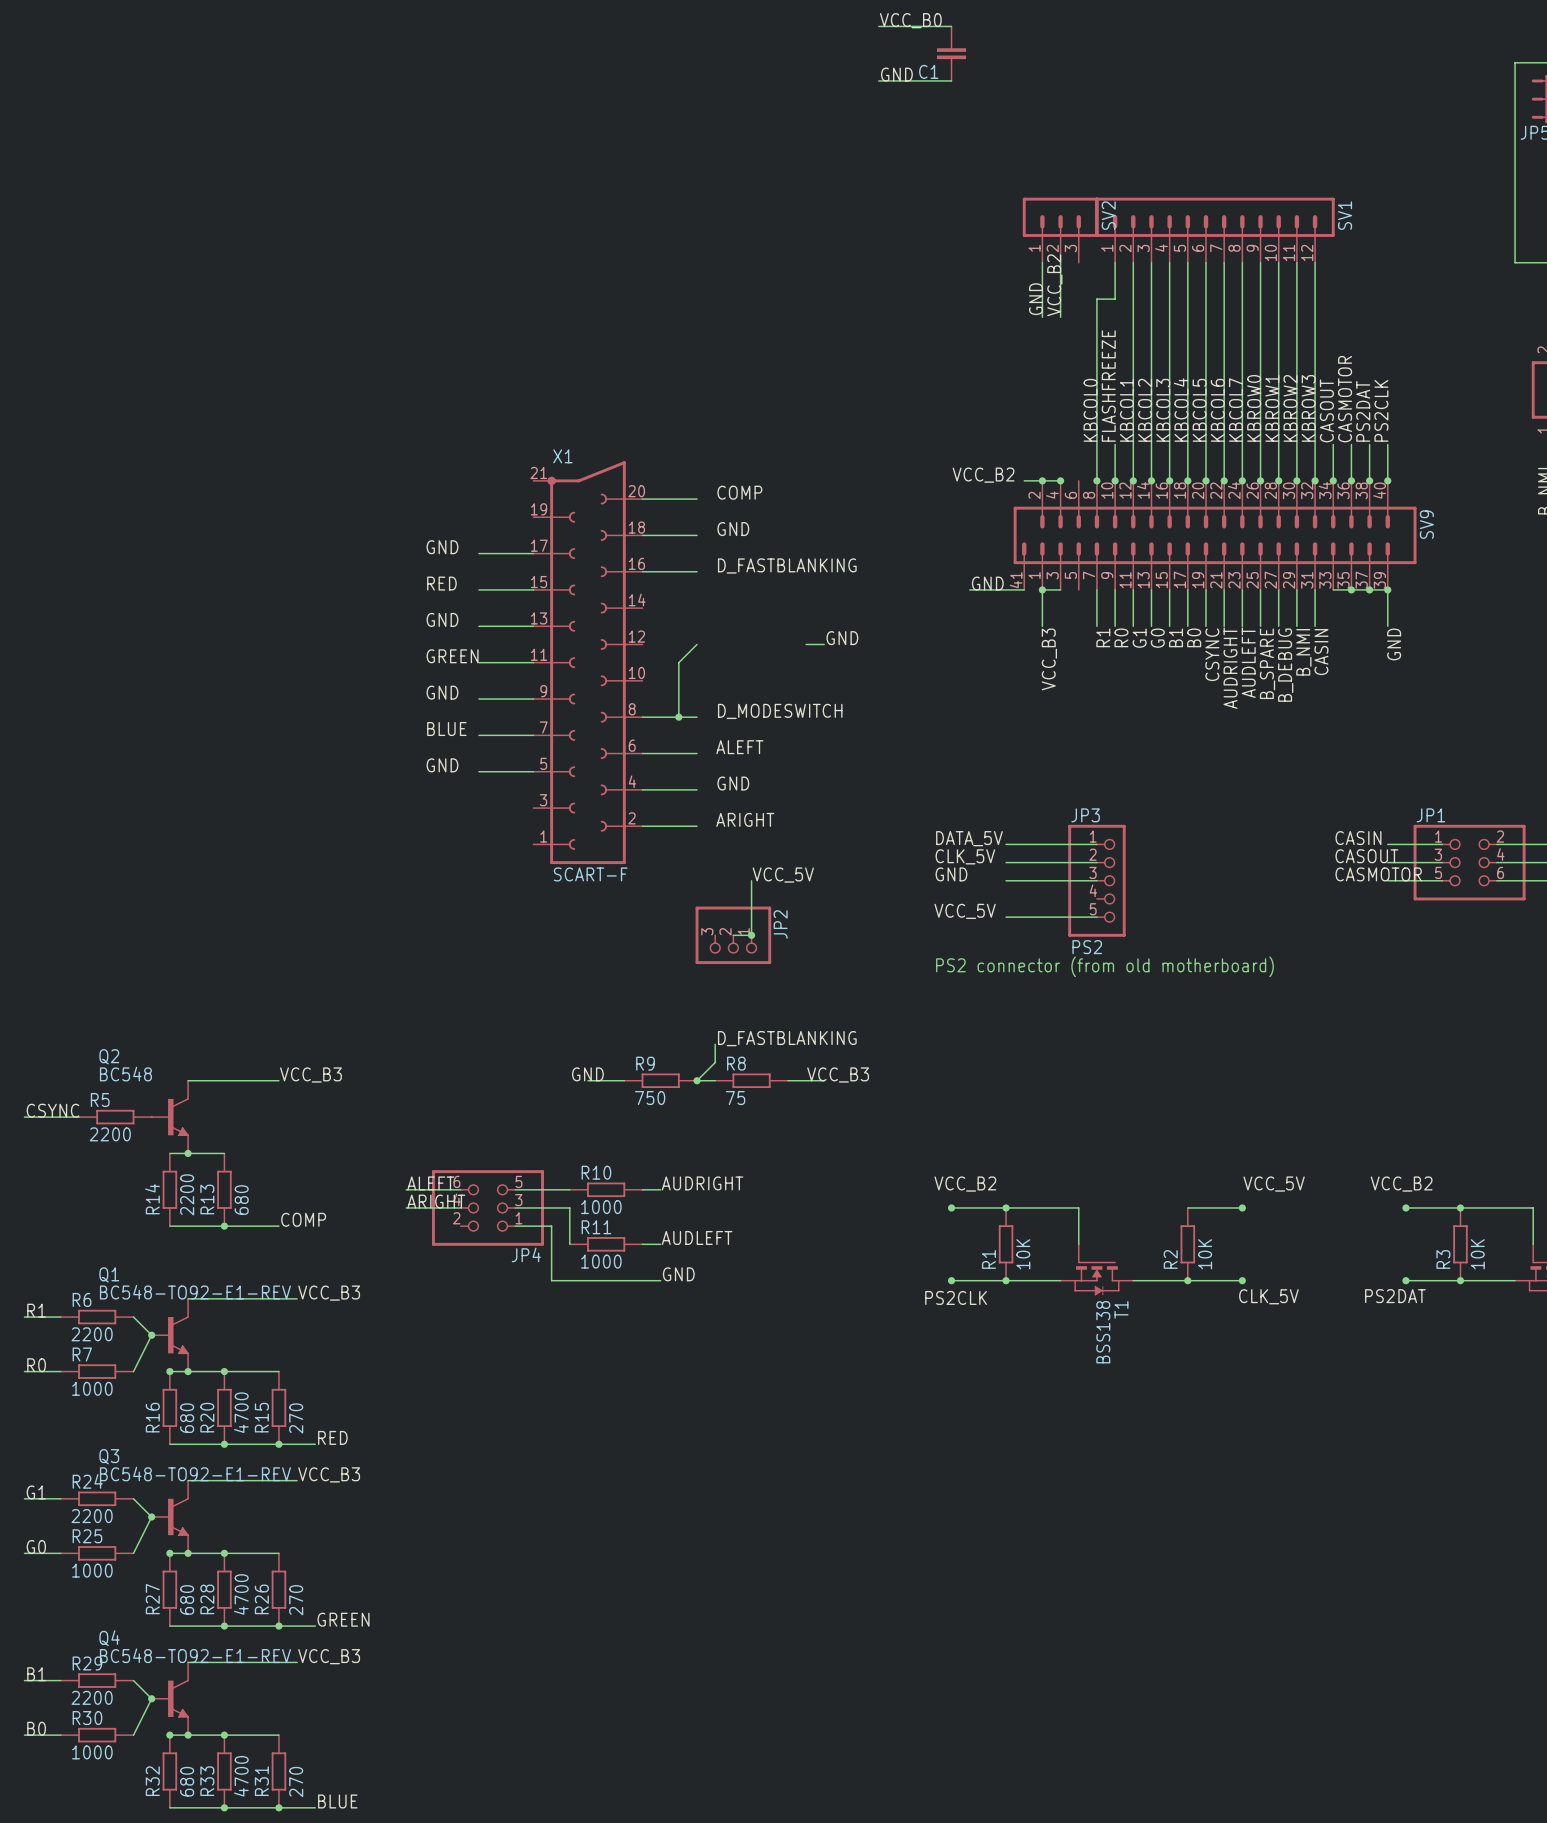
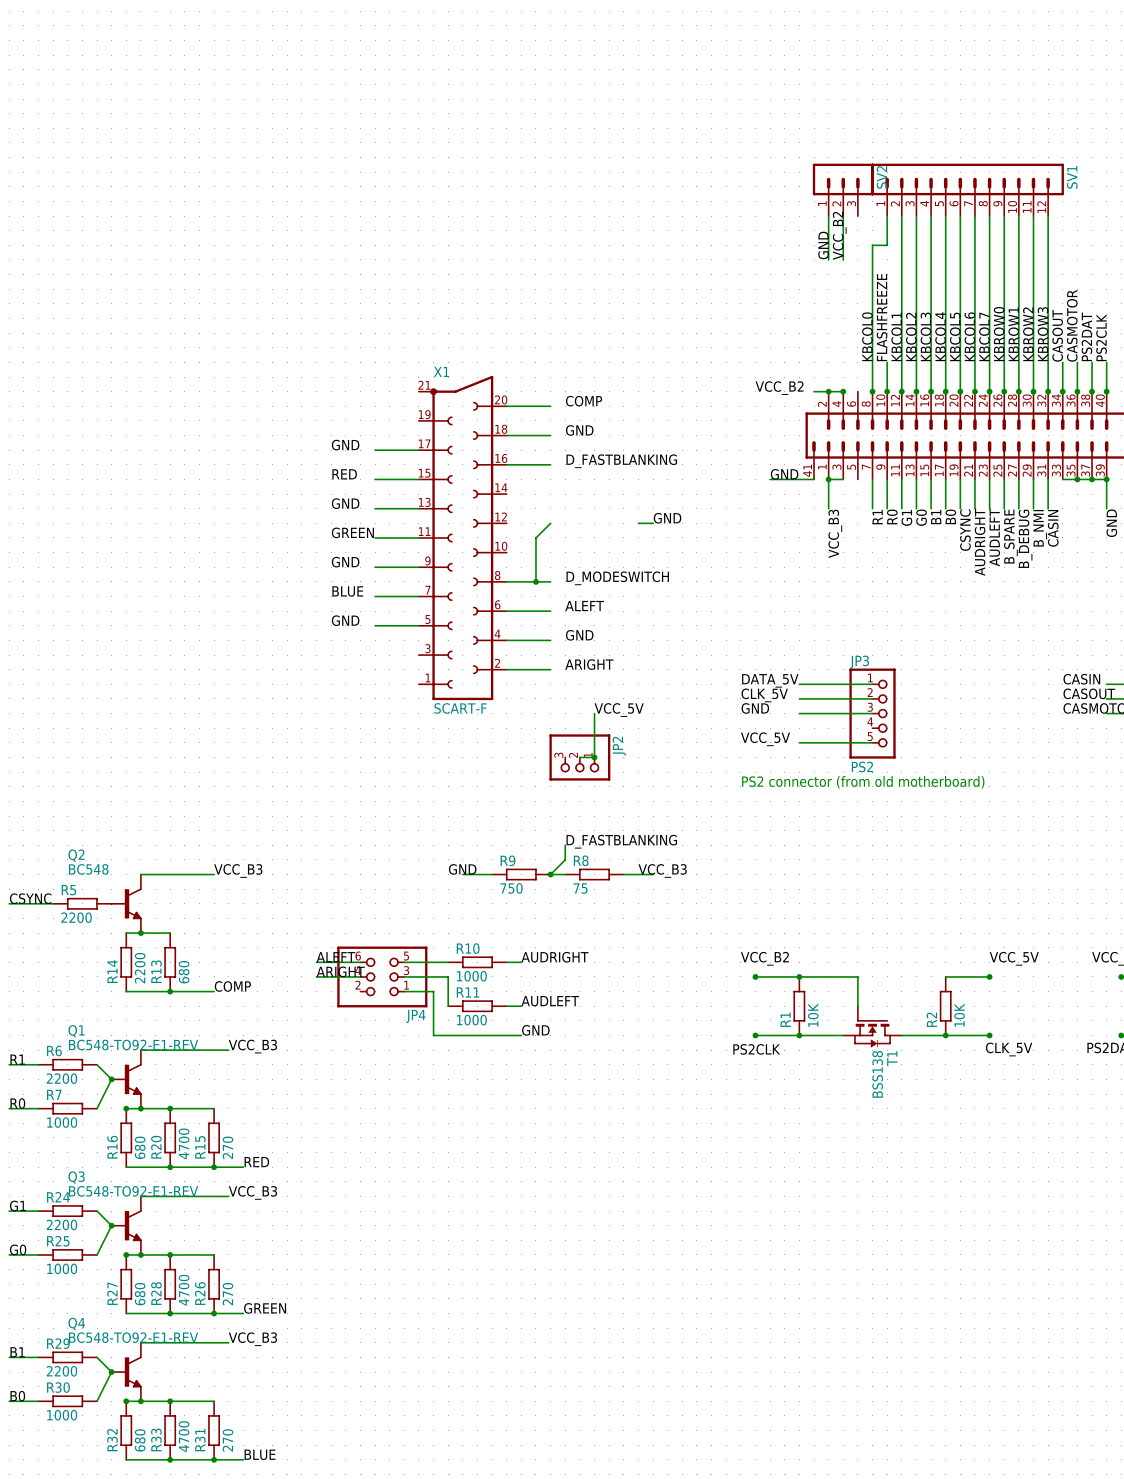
label: VCC_B0 (910, 20) -> none
wire: (878, 26) (951, 26) -> none
C1: (951, 53) -> none
label: GND (896, 74) -> none
wire: (878, 80) (951, 80) -> none

